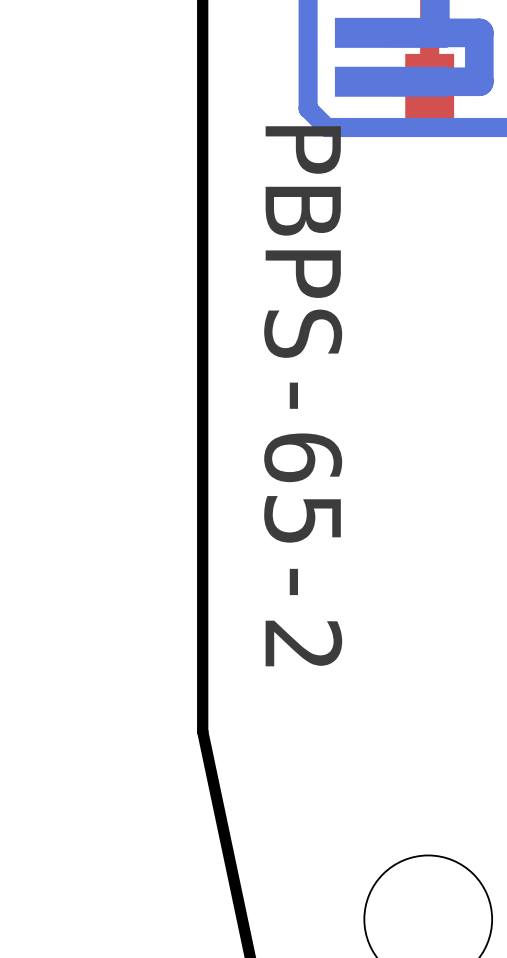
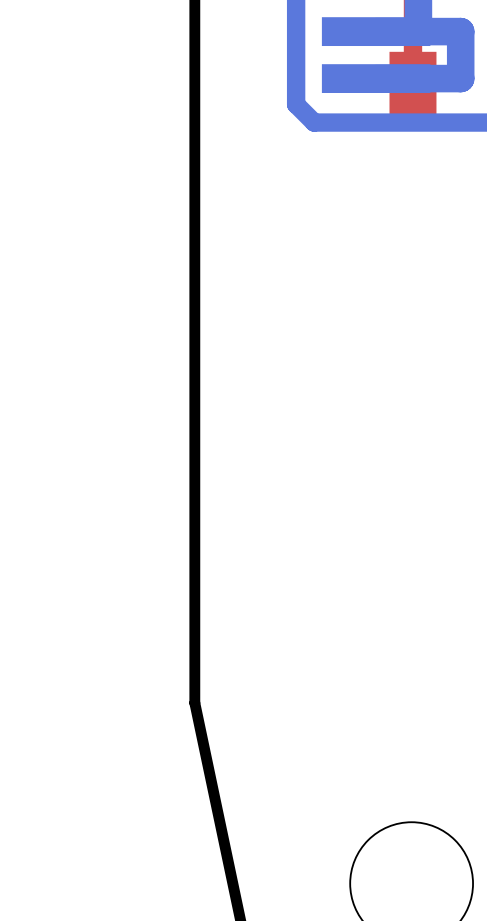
PBPS-65-2 name: PBPS-65-2 (303, 396) -> none

